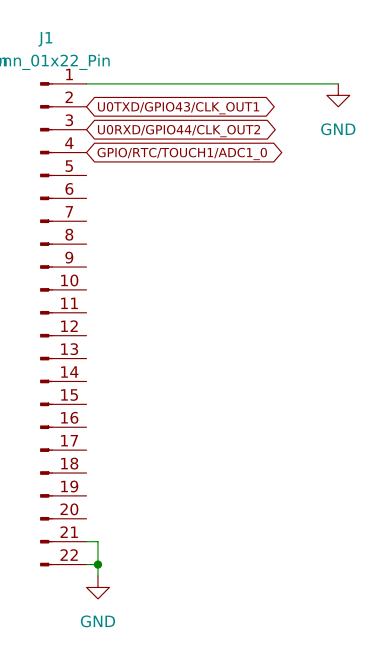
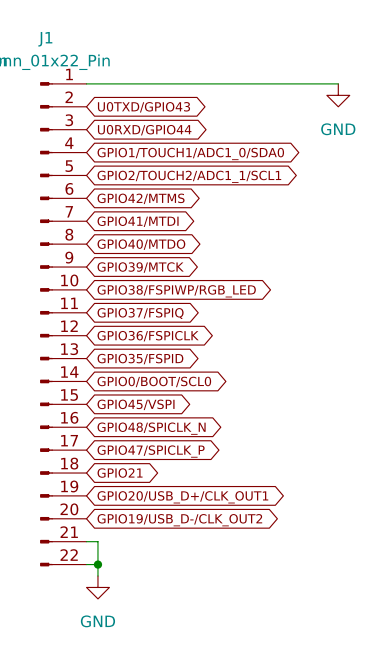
global label: U0TXD/GPIO43/CLK_OUT1 (178, 108) -> U0TXD/GPIO43 (143, 107)
global label: U0RXD/GPIO44/CLK_OUT2 (179, 131) -> U0RXD/GPIO44 (144, 130)
global label: GPIO/RTC/TOUCH1/ADC1_0 (182, 153) -> GPIO1/TOUCH1/ADC1_0/SDA0 (190, 153)
global label: none -> GPIO2/TOUCH2/ADC1_1/SCL1 (189, 176)
global label: none -> GPIO42/MTMS (141, 198)
global label: none -> GPIO41/MTDI (138, 221)
global label: none -> GPIO40/MTDO (141, 244)
global label: none -> GPIO39/MTCK (140, 267)
global label: none -> GPIO38/FSPIWP/RGB_LED (176, 291)
global label: none -> GPIO37/FSPIQ (140, 313)
global label: none -> GPIO36/FSPICLK (148, 336)
global label: none -> GPIO35/FSPID (140, 359)
global label: none -> GPIO0/BOOT/SCL0 (154, 381)
global label: none -> GPIO45/VSPI (136, 404)
global label: none -> GPIO48/SPICLK_N (151, 428)
global label: none -> GPIO47/SPICLK_P (151, 451)
global label: none -> GPIO21 (120, 473)
global label: none -> GPIO20/USB_D+/CLK_OUT1 (182, 497)
global label: none -> GPIO19/USB_D-/CLK_OUT2 (179, 520)

